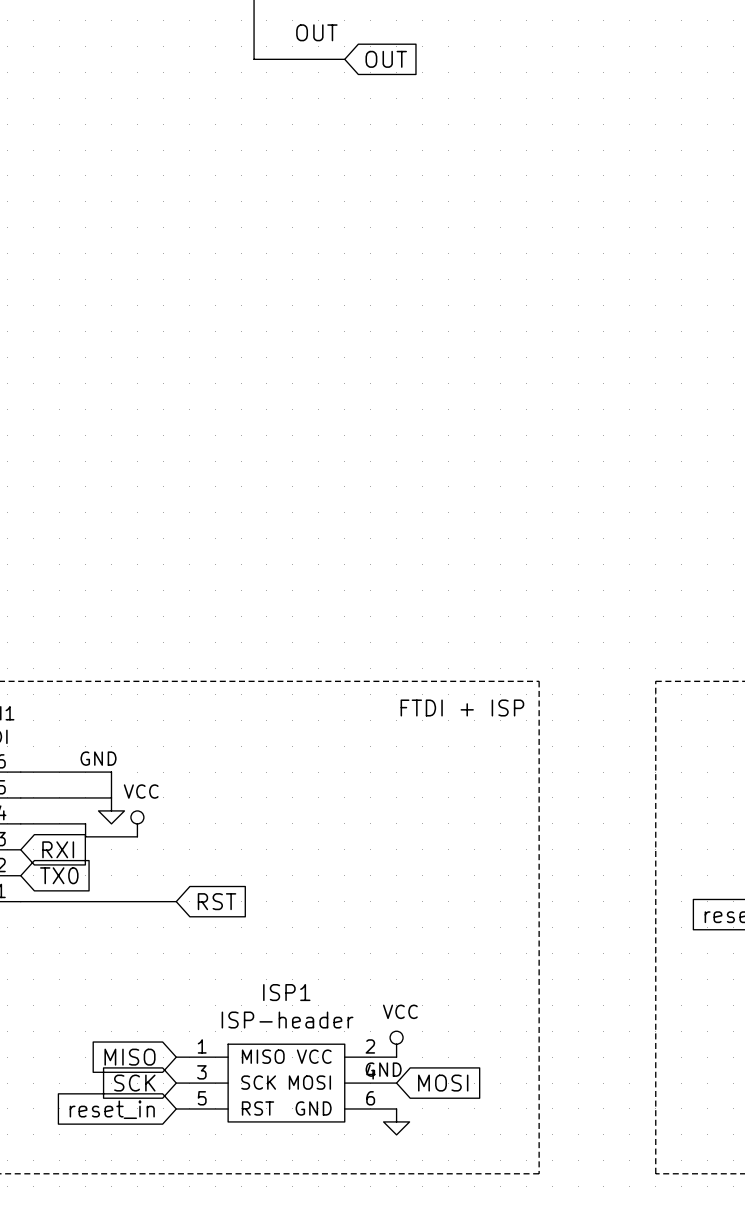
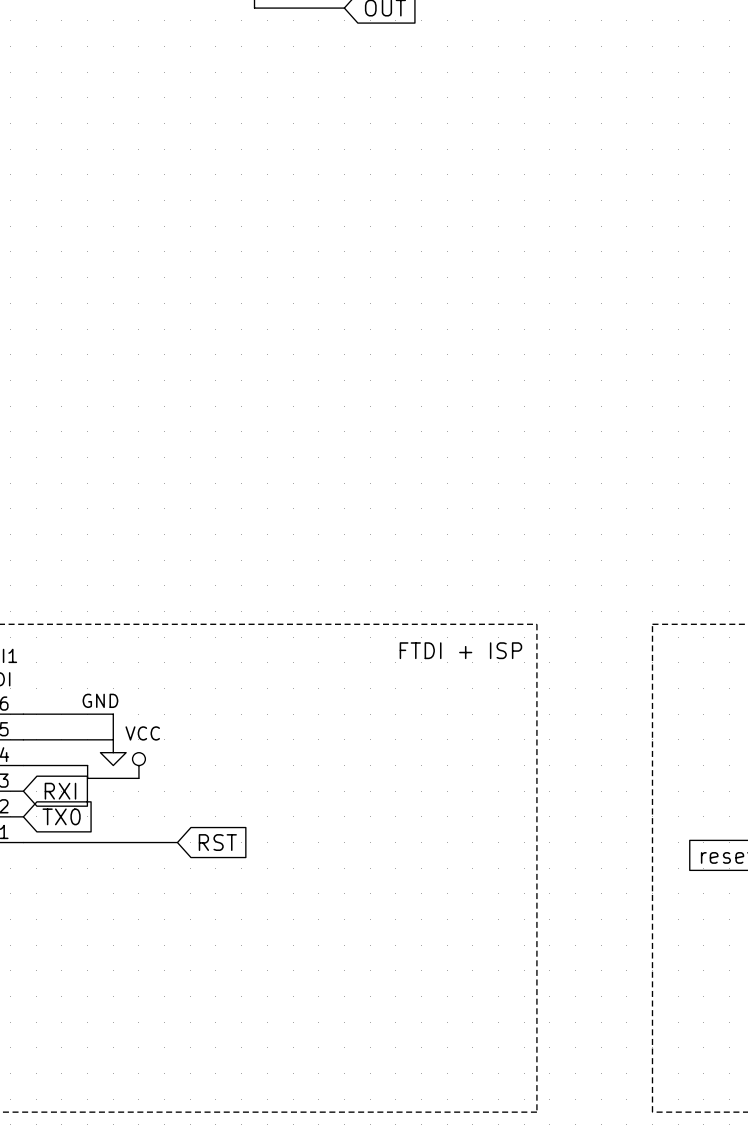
power symbol: VCC (396, 1044) -> none
global label: MISO (130, 1057) -> none
global label: SCK (134, 1083) -> none
ISP1: ISP-header (286, 1083) -> none
global label: MOSI (443, 1083) -> none
global label: reset_in (112, 1109) -> none
power symbol: GND (396, 1121) -> none

